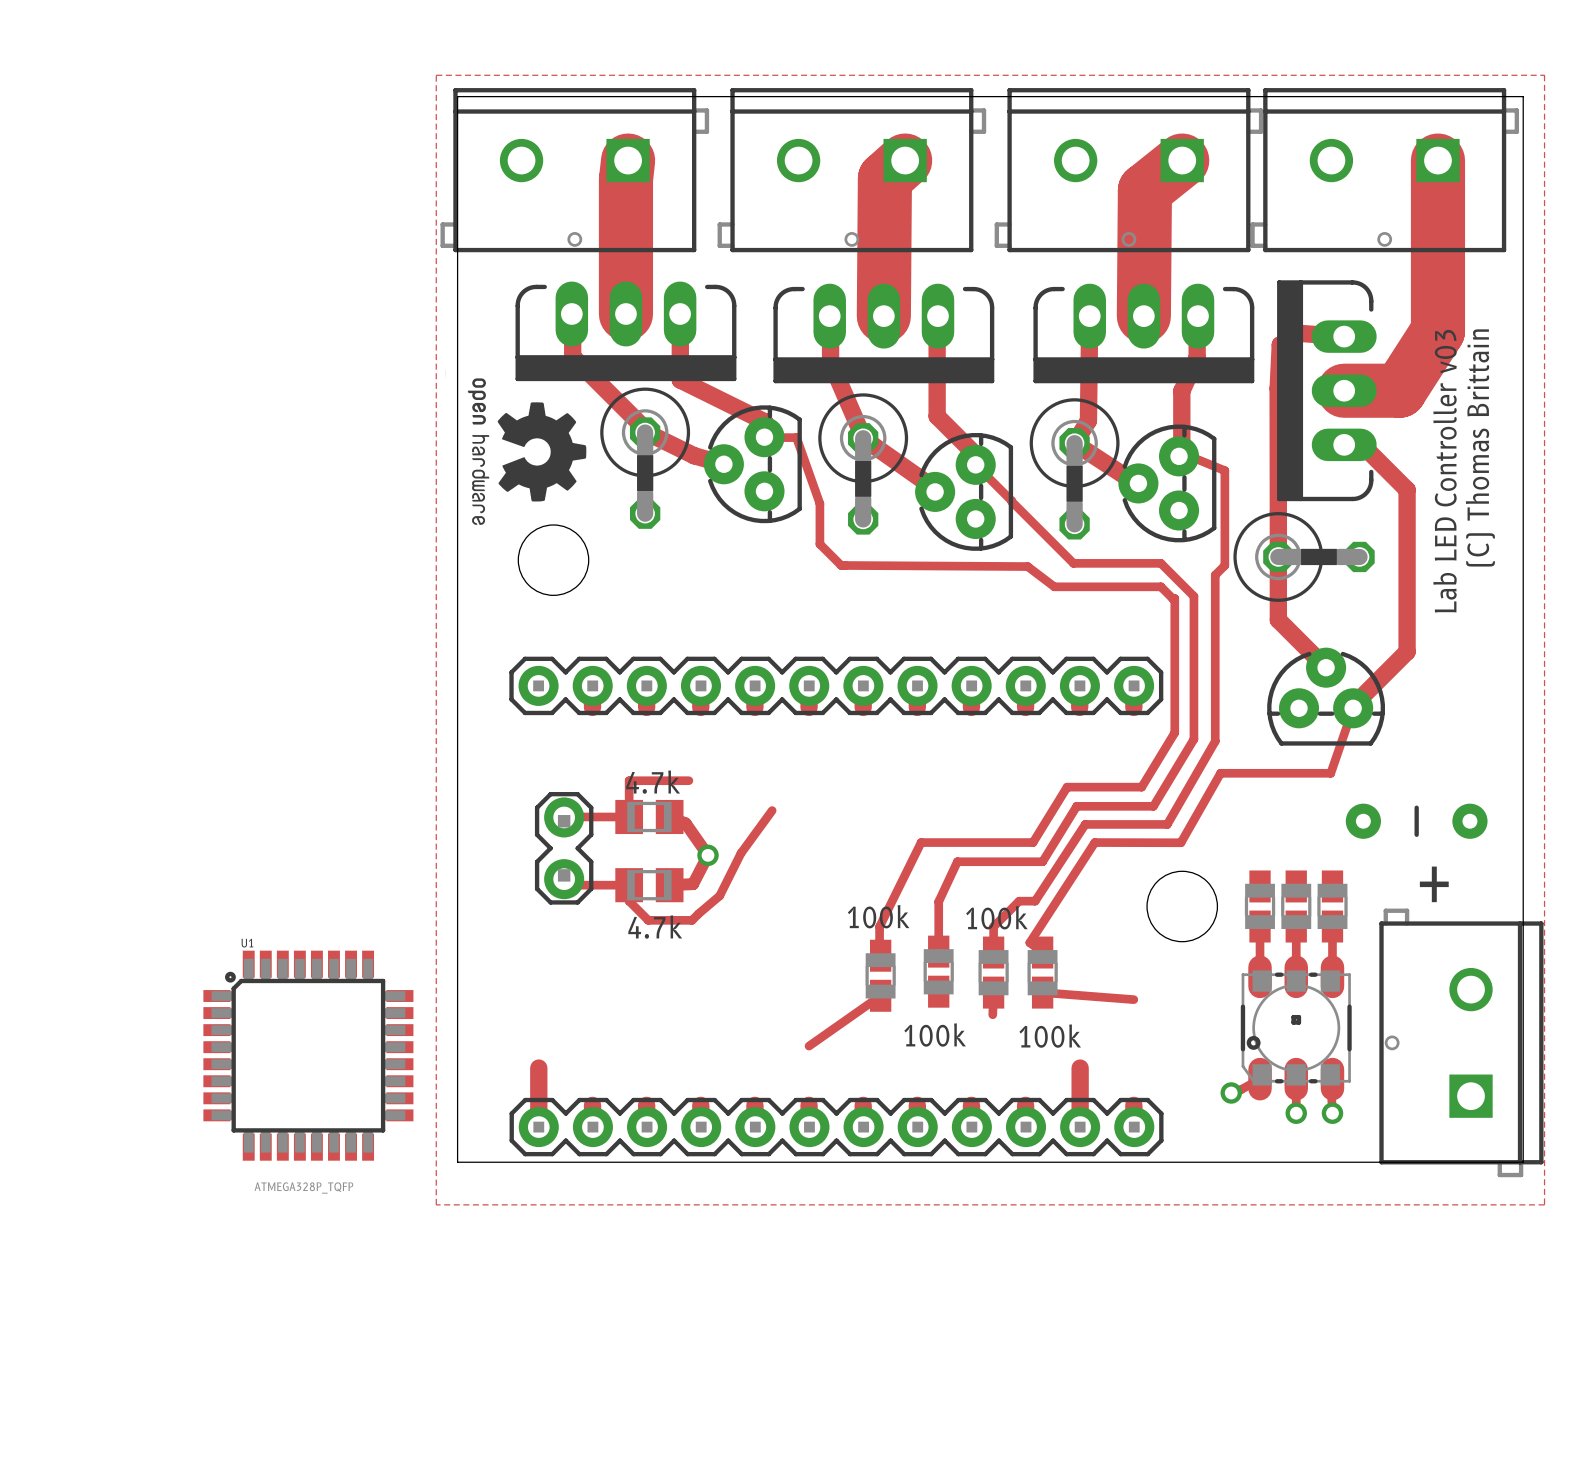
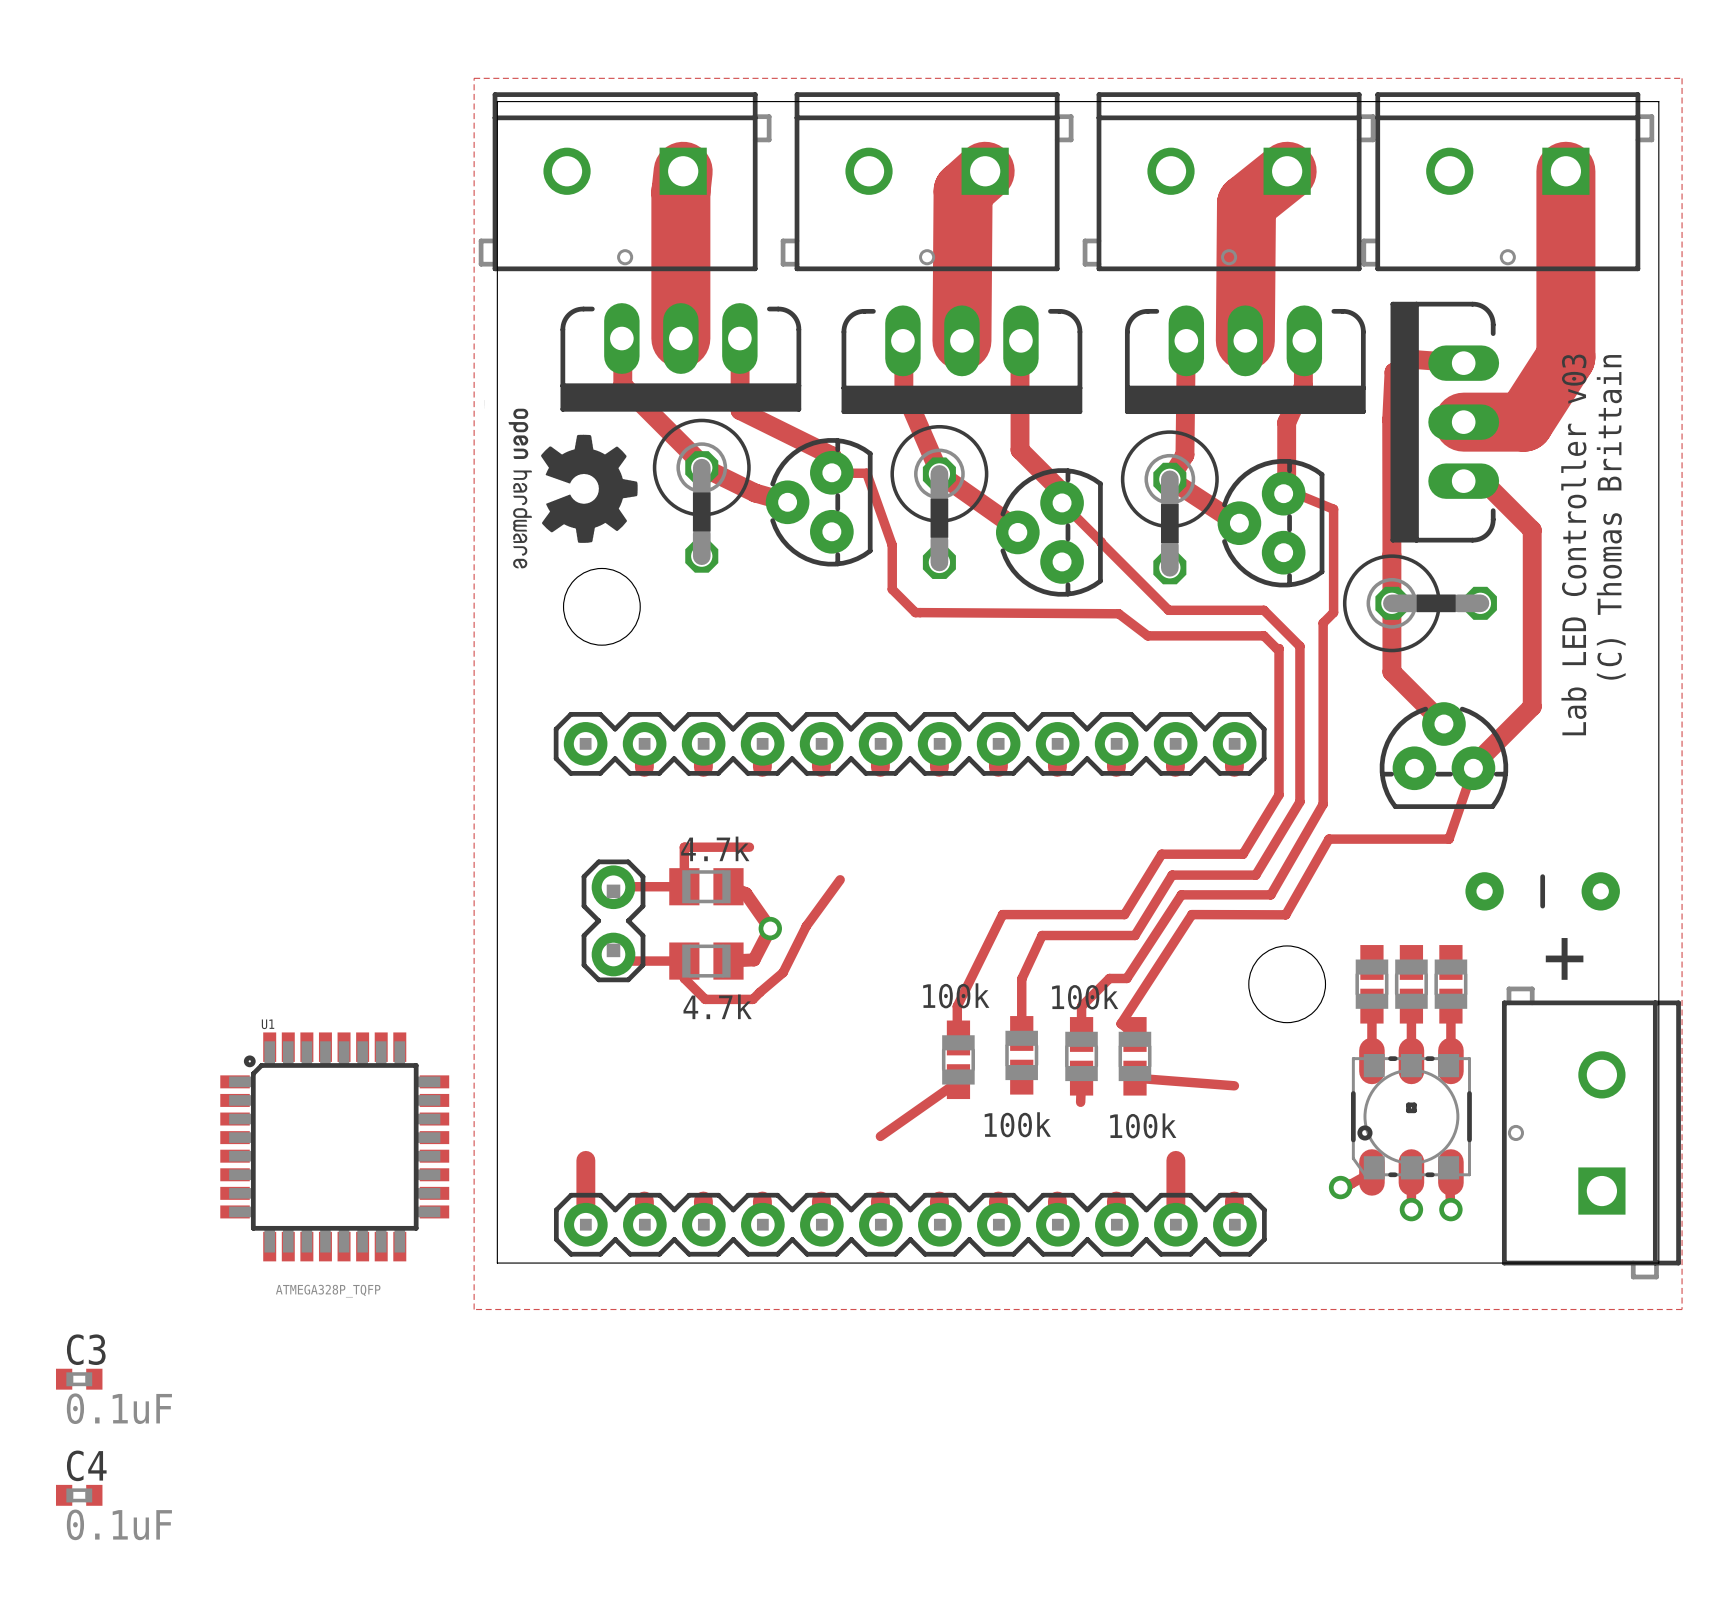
C3: none -> 0.1uF (79, 1379)
C4: none -> 0.1uF (79, 1495)

